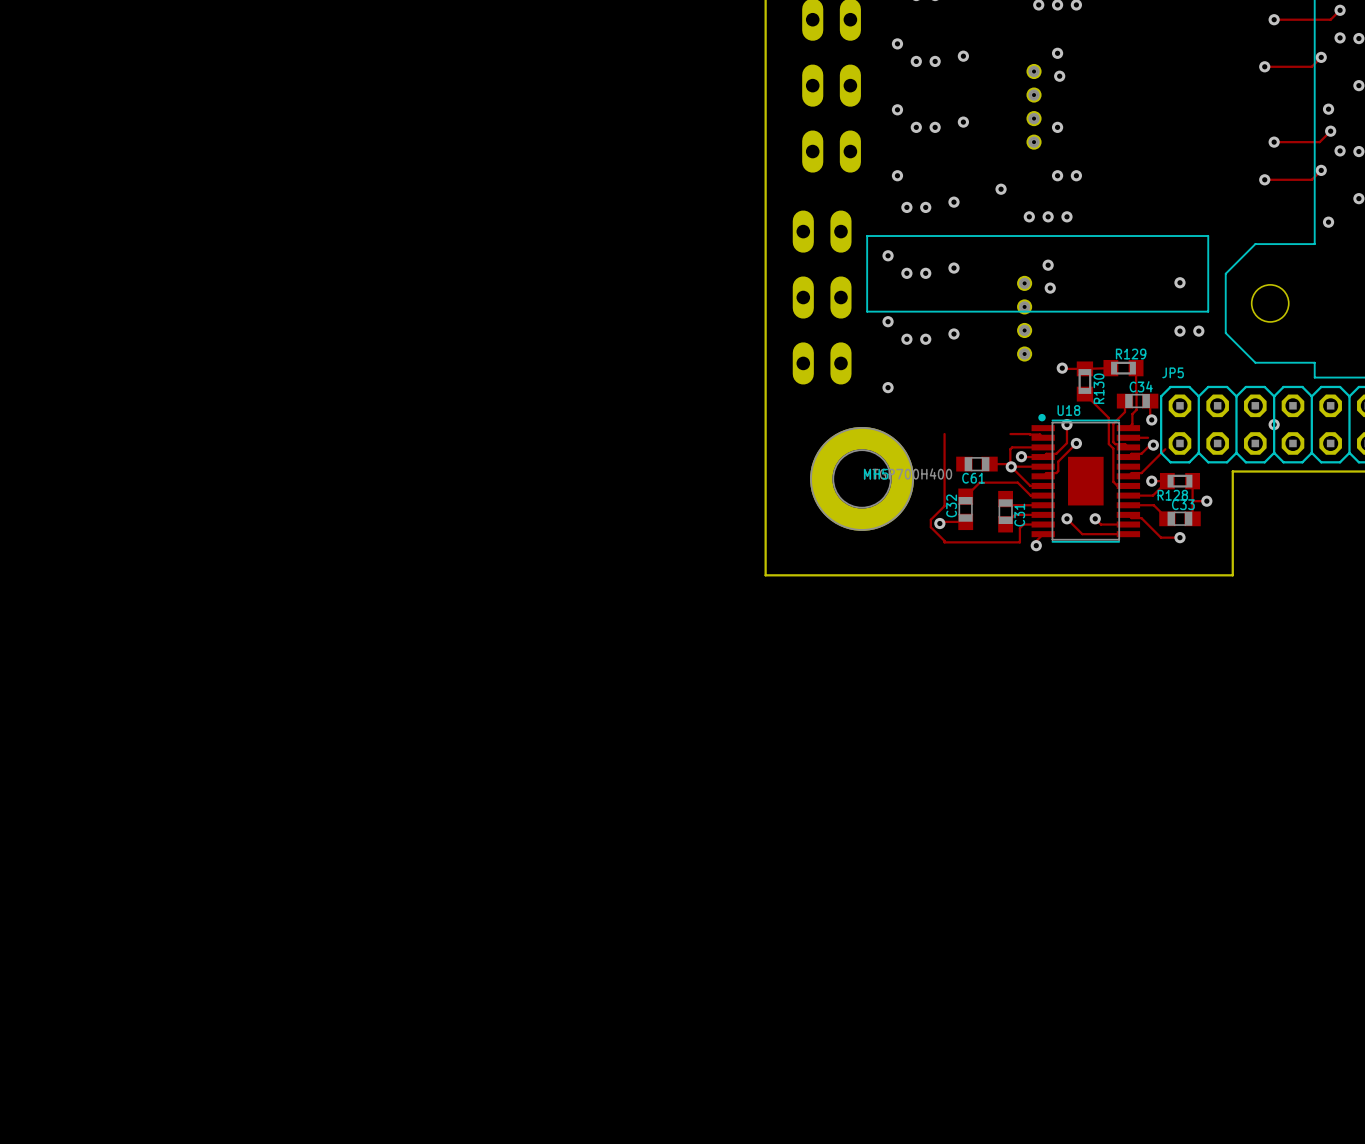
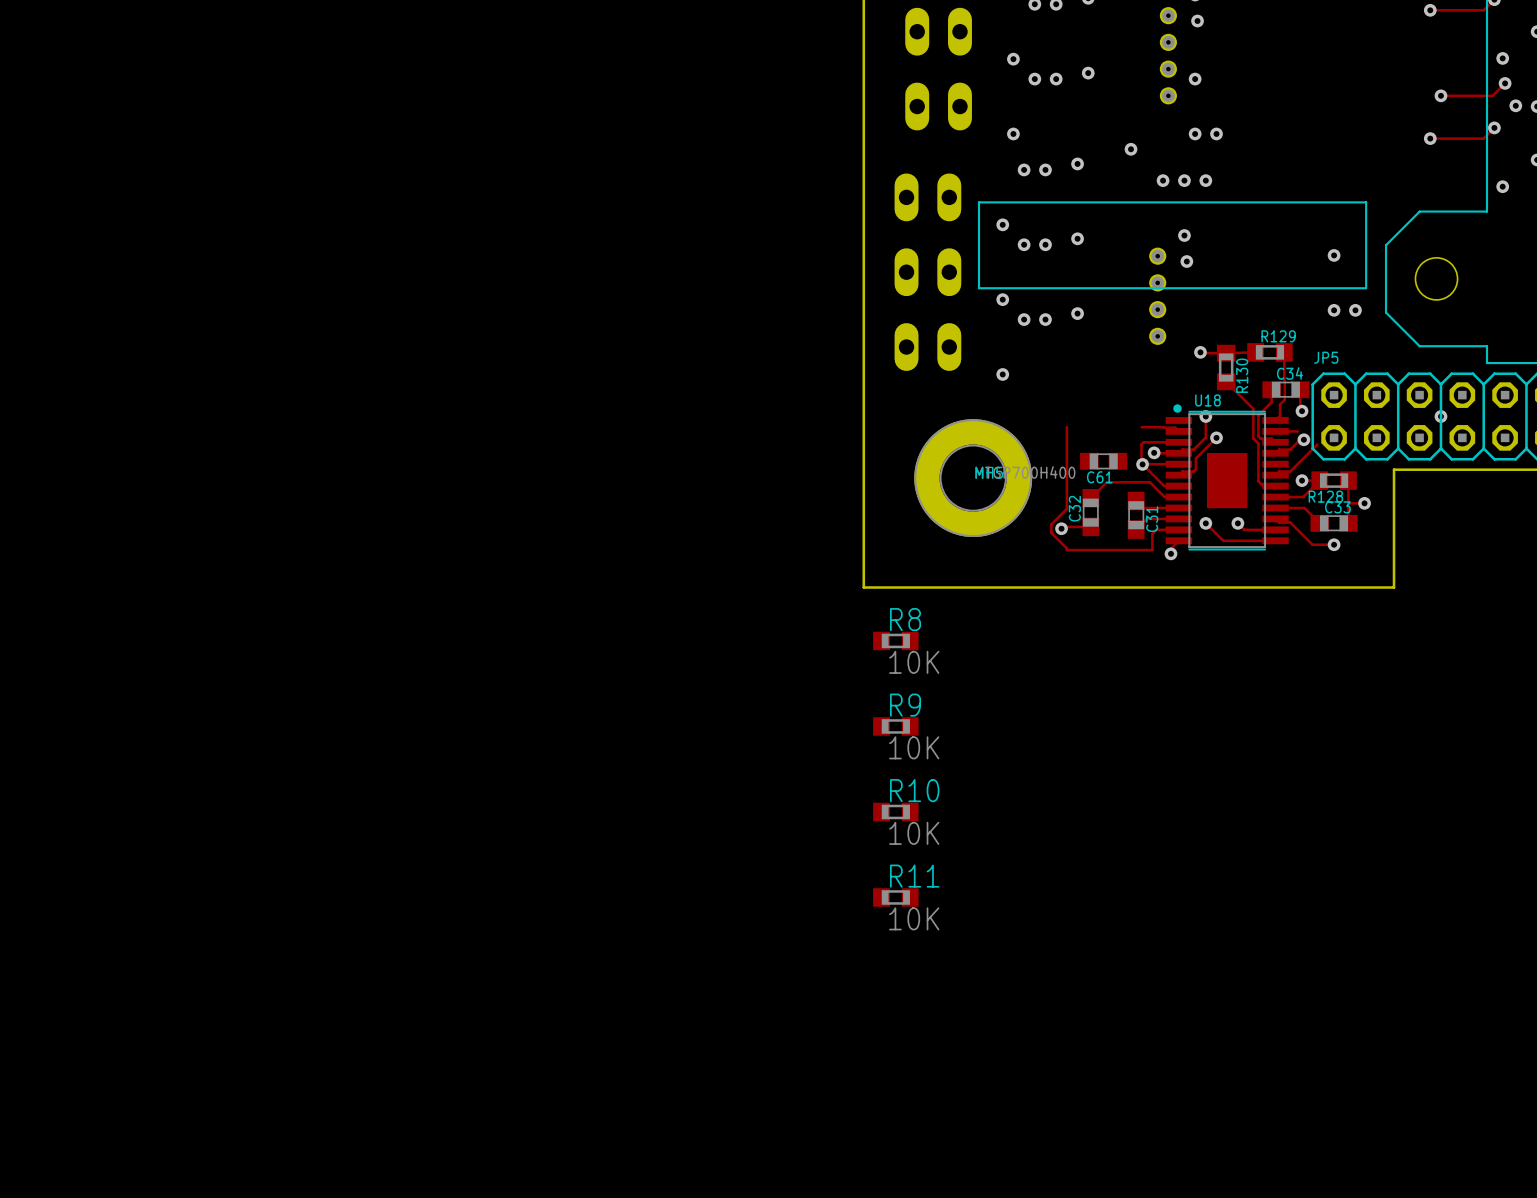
track: (989, 464) (1008, 464) -> none
R8: none -> 10K (895, 640)
R9: none -> 10K (895, 726)
R10: none -> 10K (895, 811)
R11: none -> 10K (895, 897)

